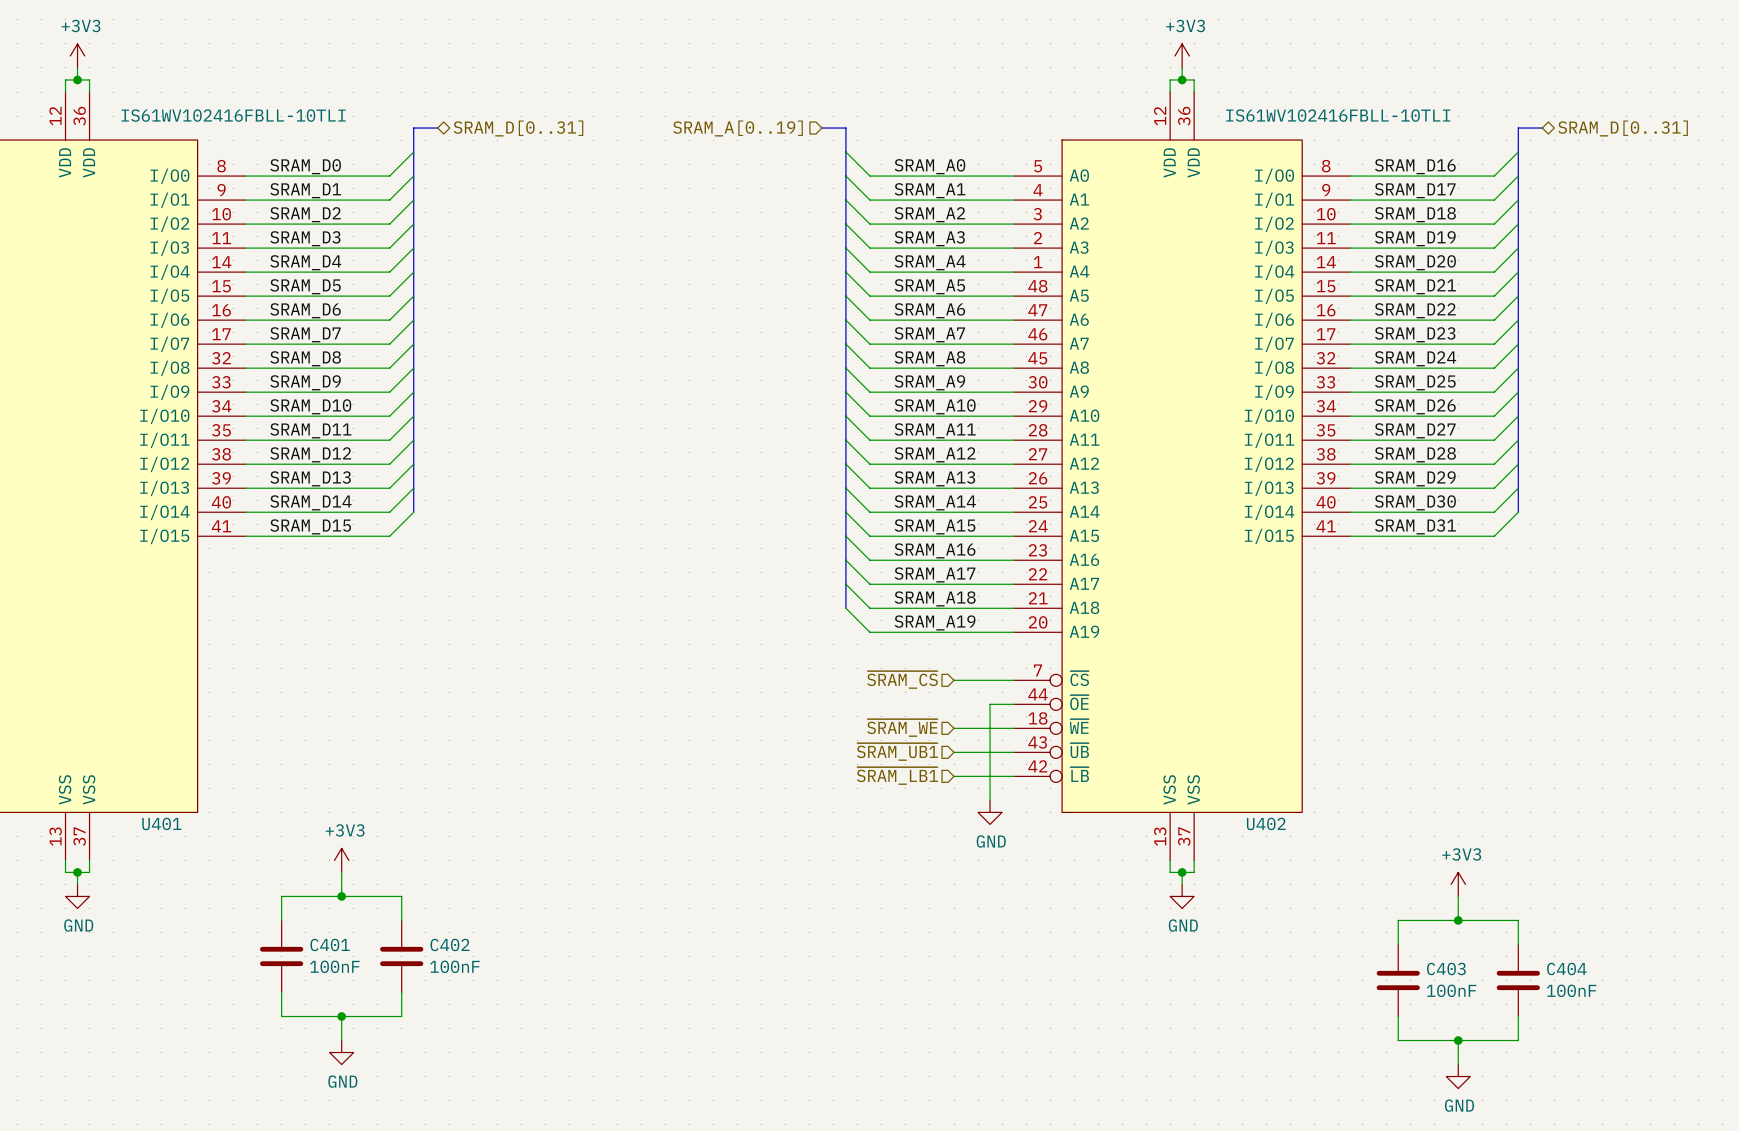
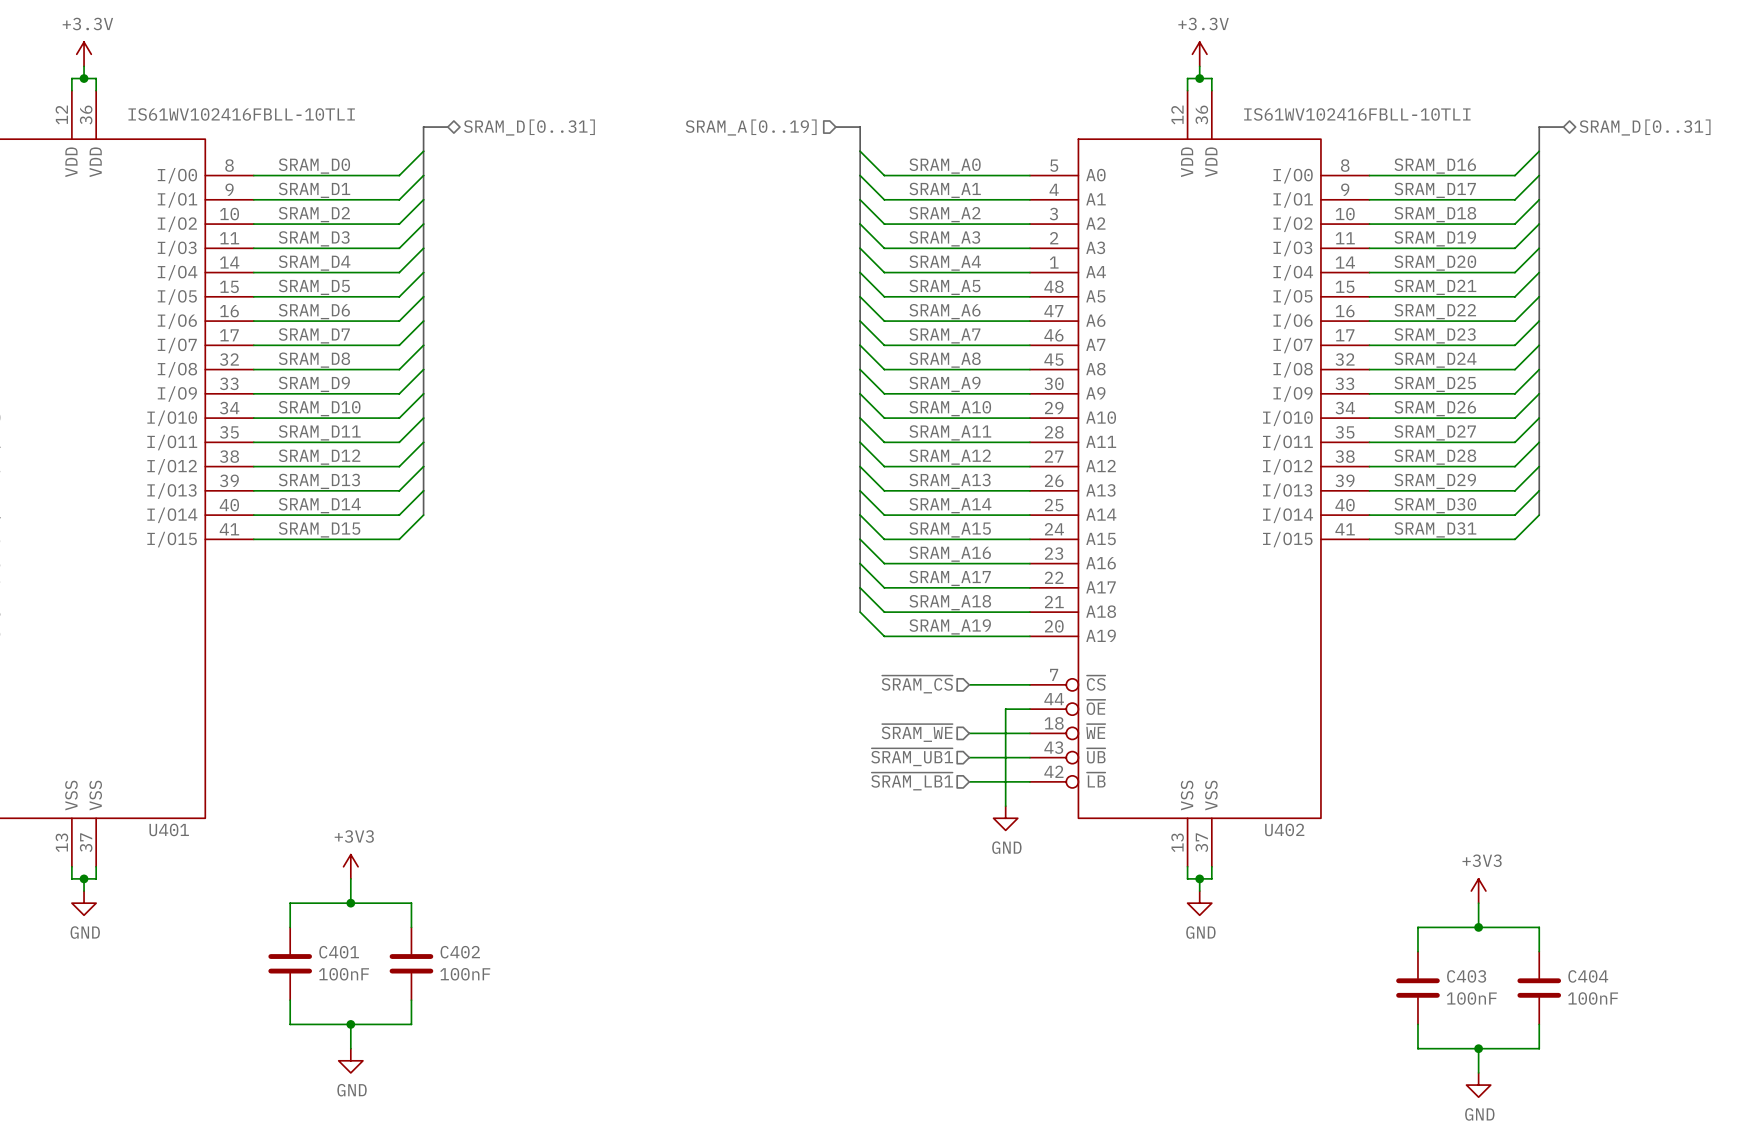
power symbol: +3V3 (77, 55) -> +3.3V (84, 54)
power symbol: +3V3 (1182, 55) -> +3.3V (1199, 54)

